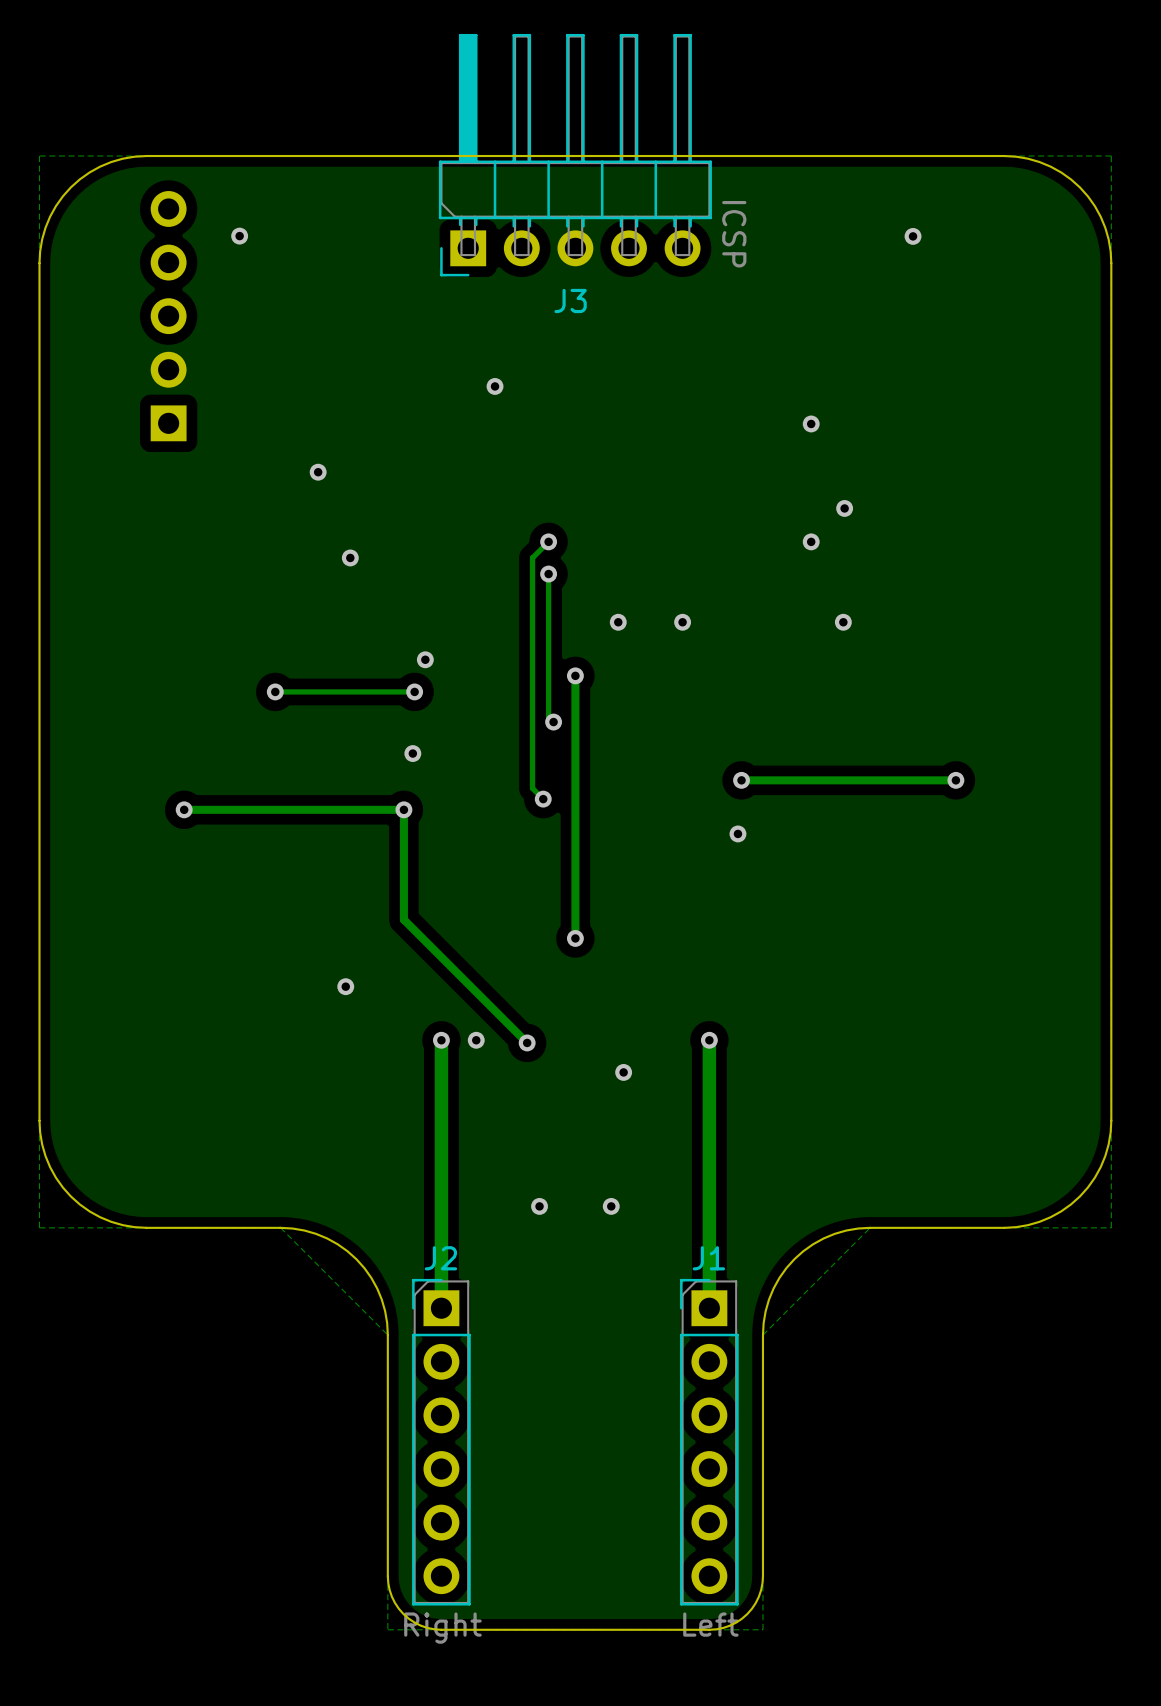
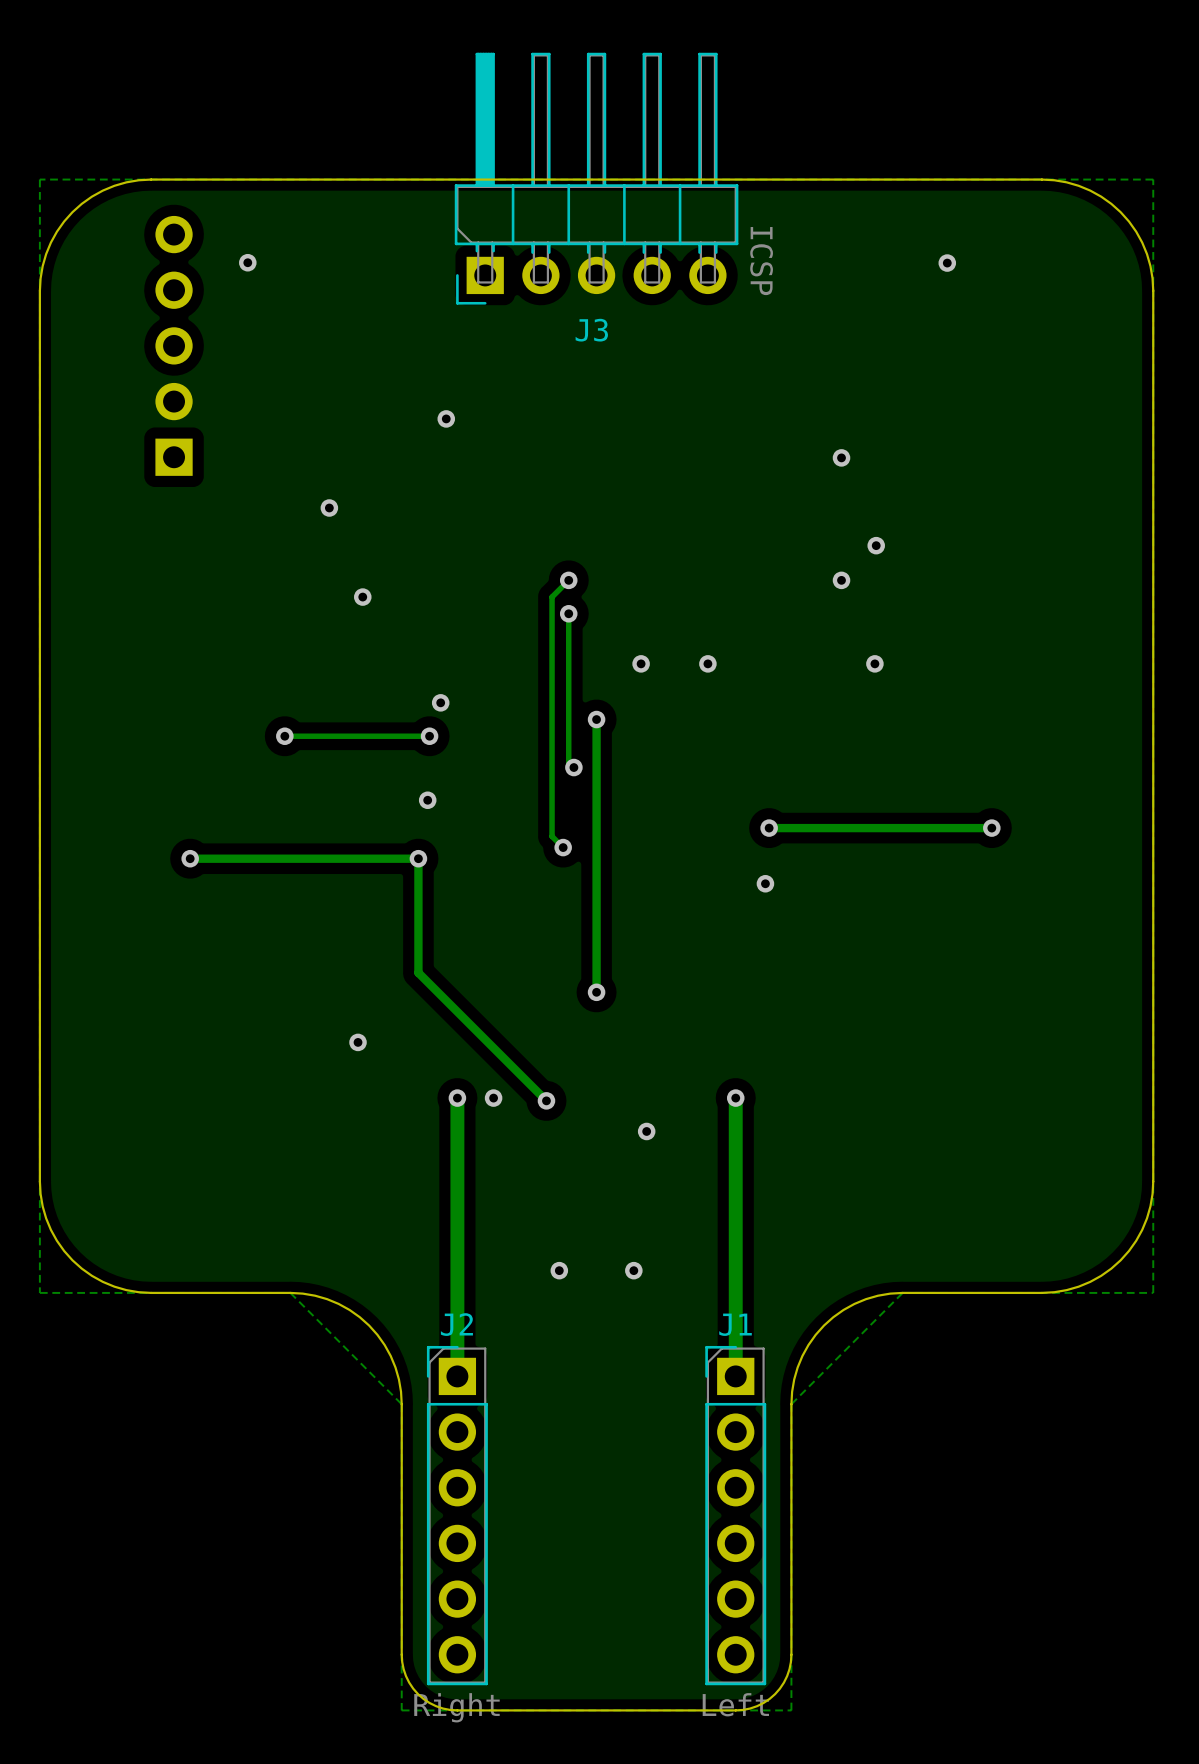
via position: (495, 386) -> (446, 418)

